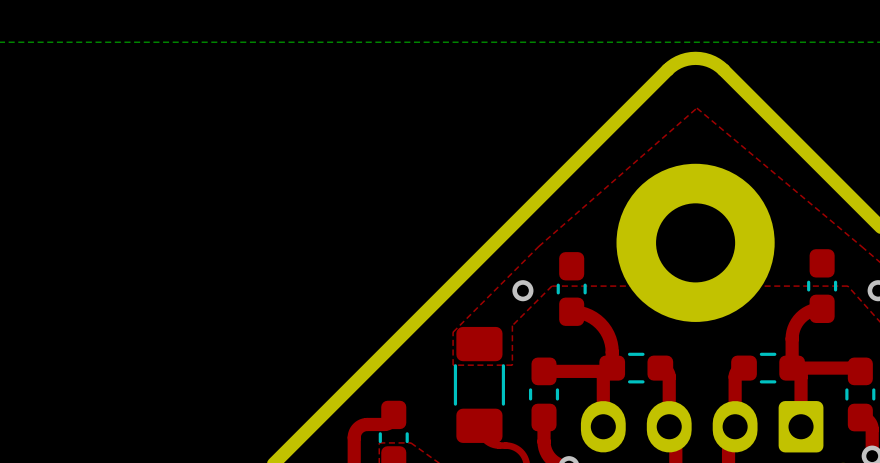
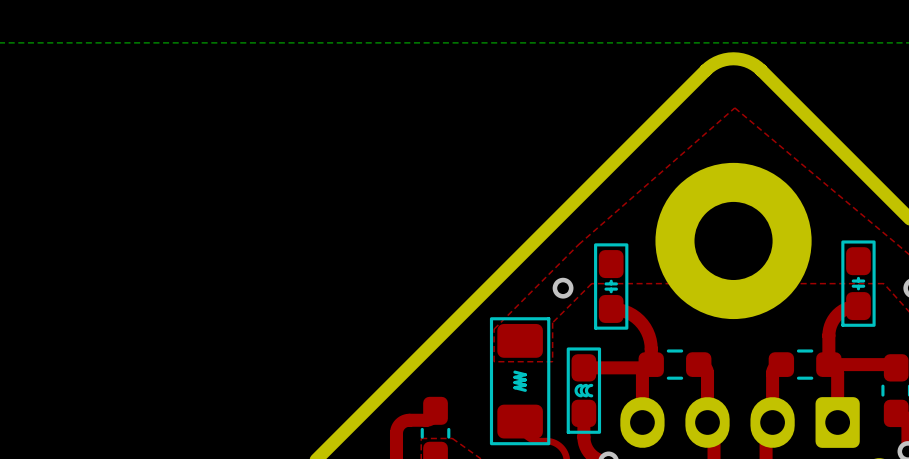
part footprint: [807, 249, 838, 323] -> [841, 240, 876, 327]
part footprint: [556, 252, 587, 326] -> [594, 243, 629, 330]
part footprint: [453, 326, 506, 443] -> [489, 317, 551, 446]
part footprint: [528, 357, 560, 432] -> [566, 347, 602, 434]

